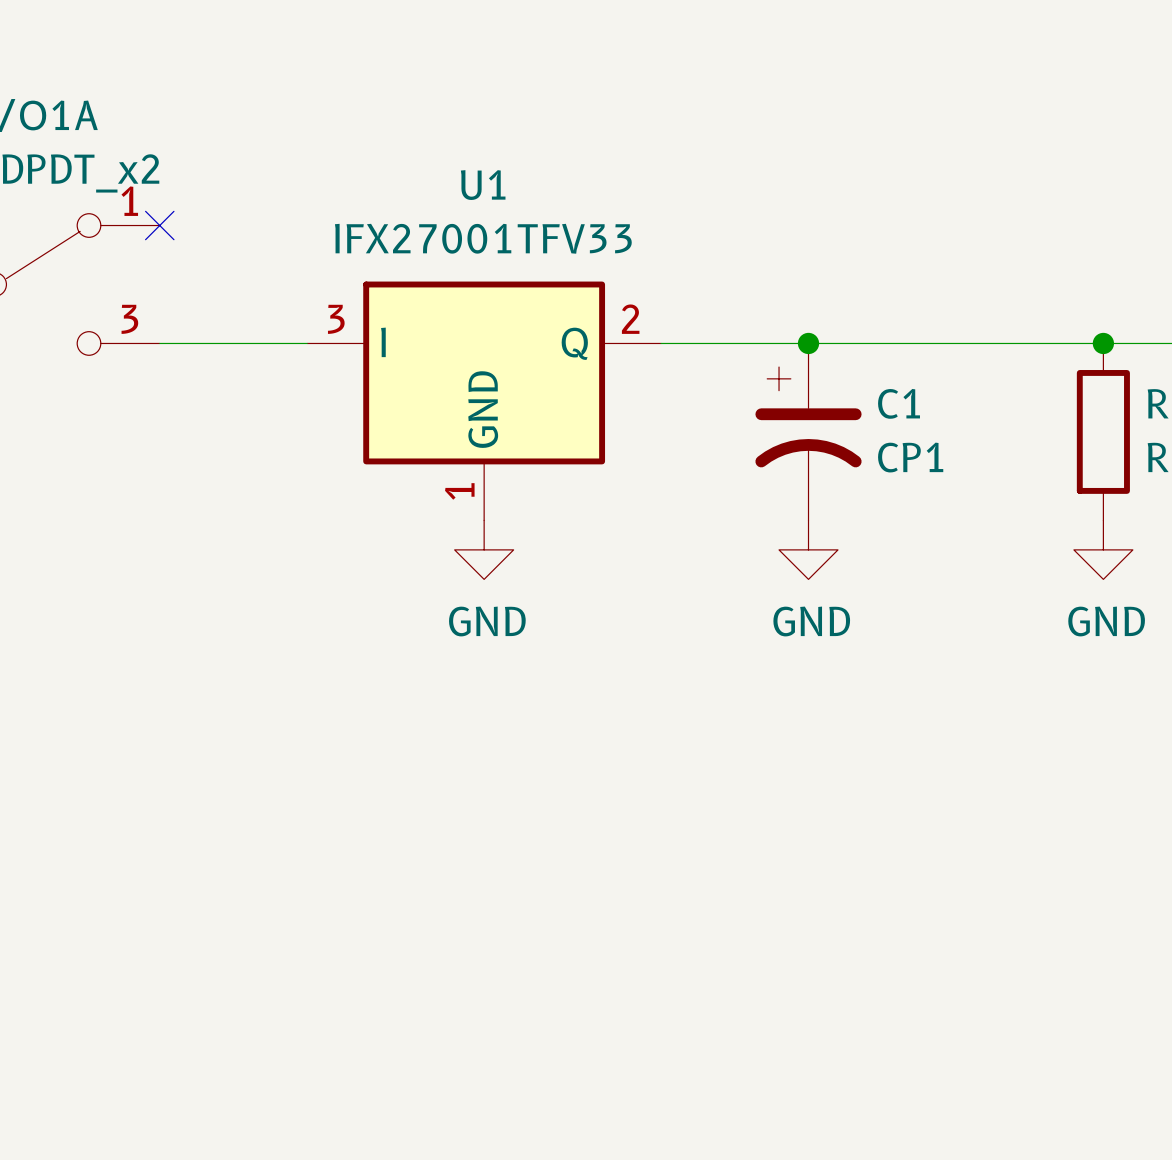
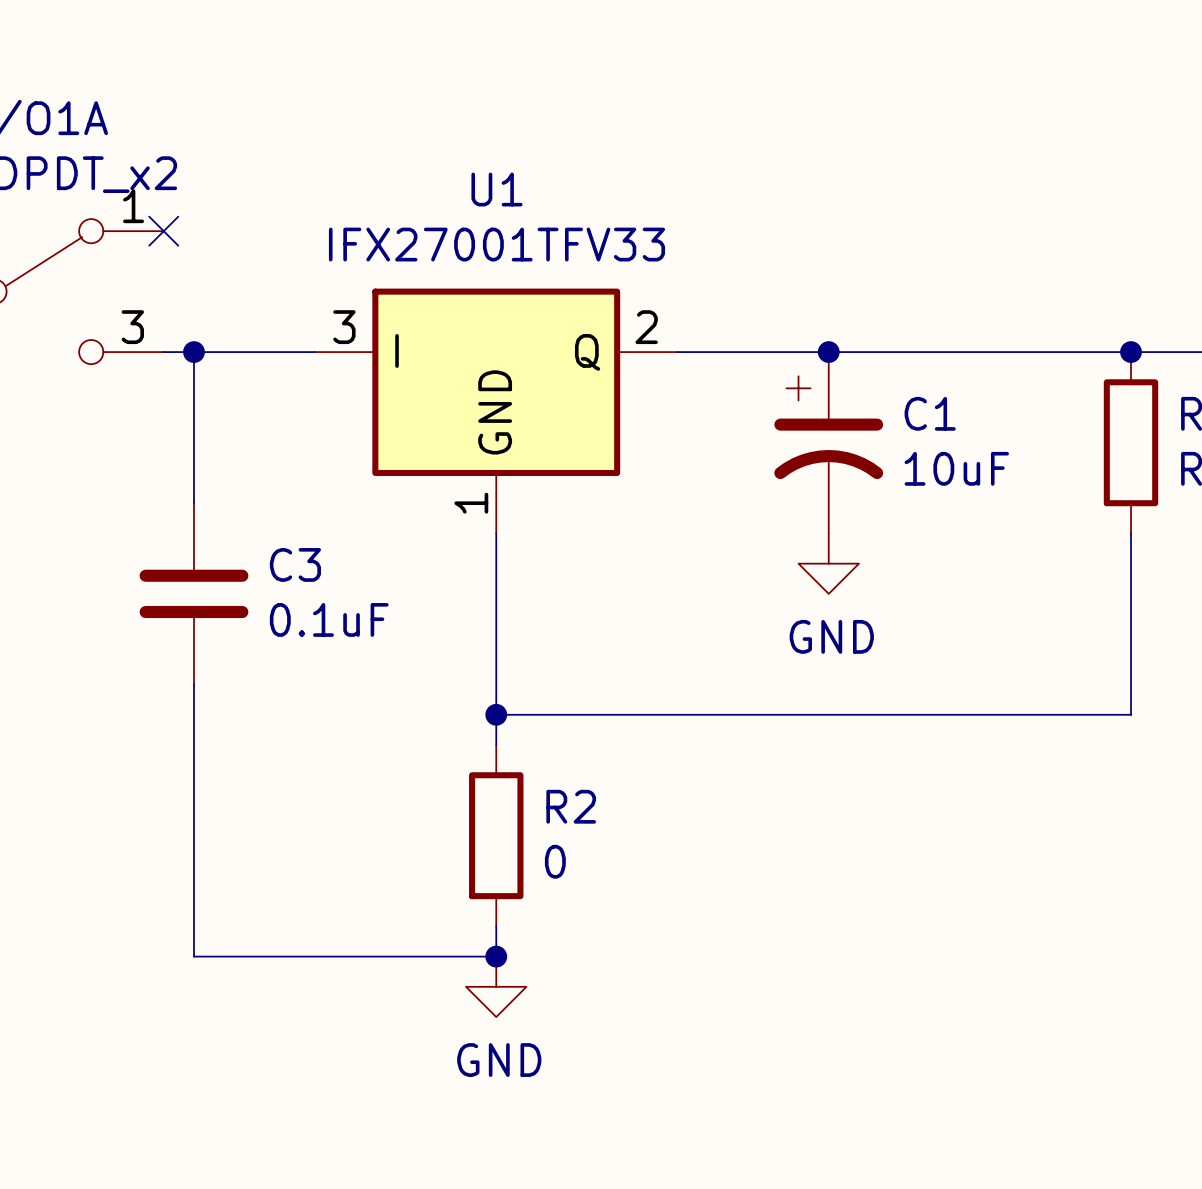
wire: none -> (193, 352) (193, 503)
junction: none -> (193, 352)
C1 value: CP1 (910, 457) -> 10uF (956, 468)
wire: none -> (496, 533) (496, 745)
wire: none -> (1131, 533) (1131, 714) (496, 714)
power symbol: GND (484, 549) -> none
power symbol: GND (1103, 549) -> none
C3: none -> 0.1uF (193, 593)
wire: none -> (193, 684) (193, 956) (496, 956) (496, 926)
junction: none -> (496, 714)
R2: none -> 0 (496, 835)
junction: none -> (496, 956)
power symbol: none -> GND (496, 986)

